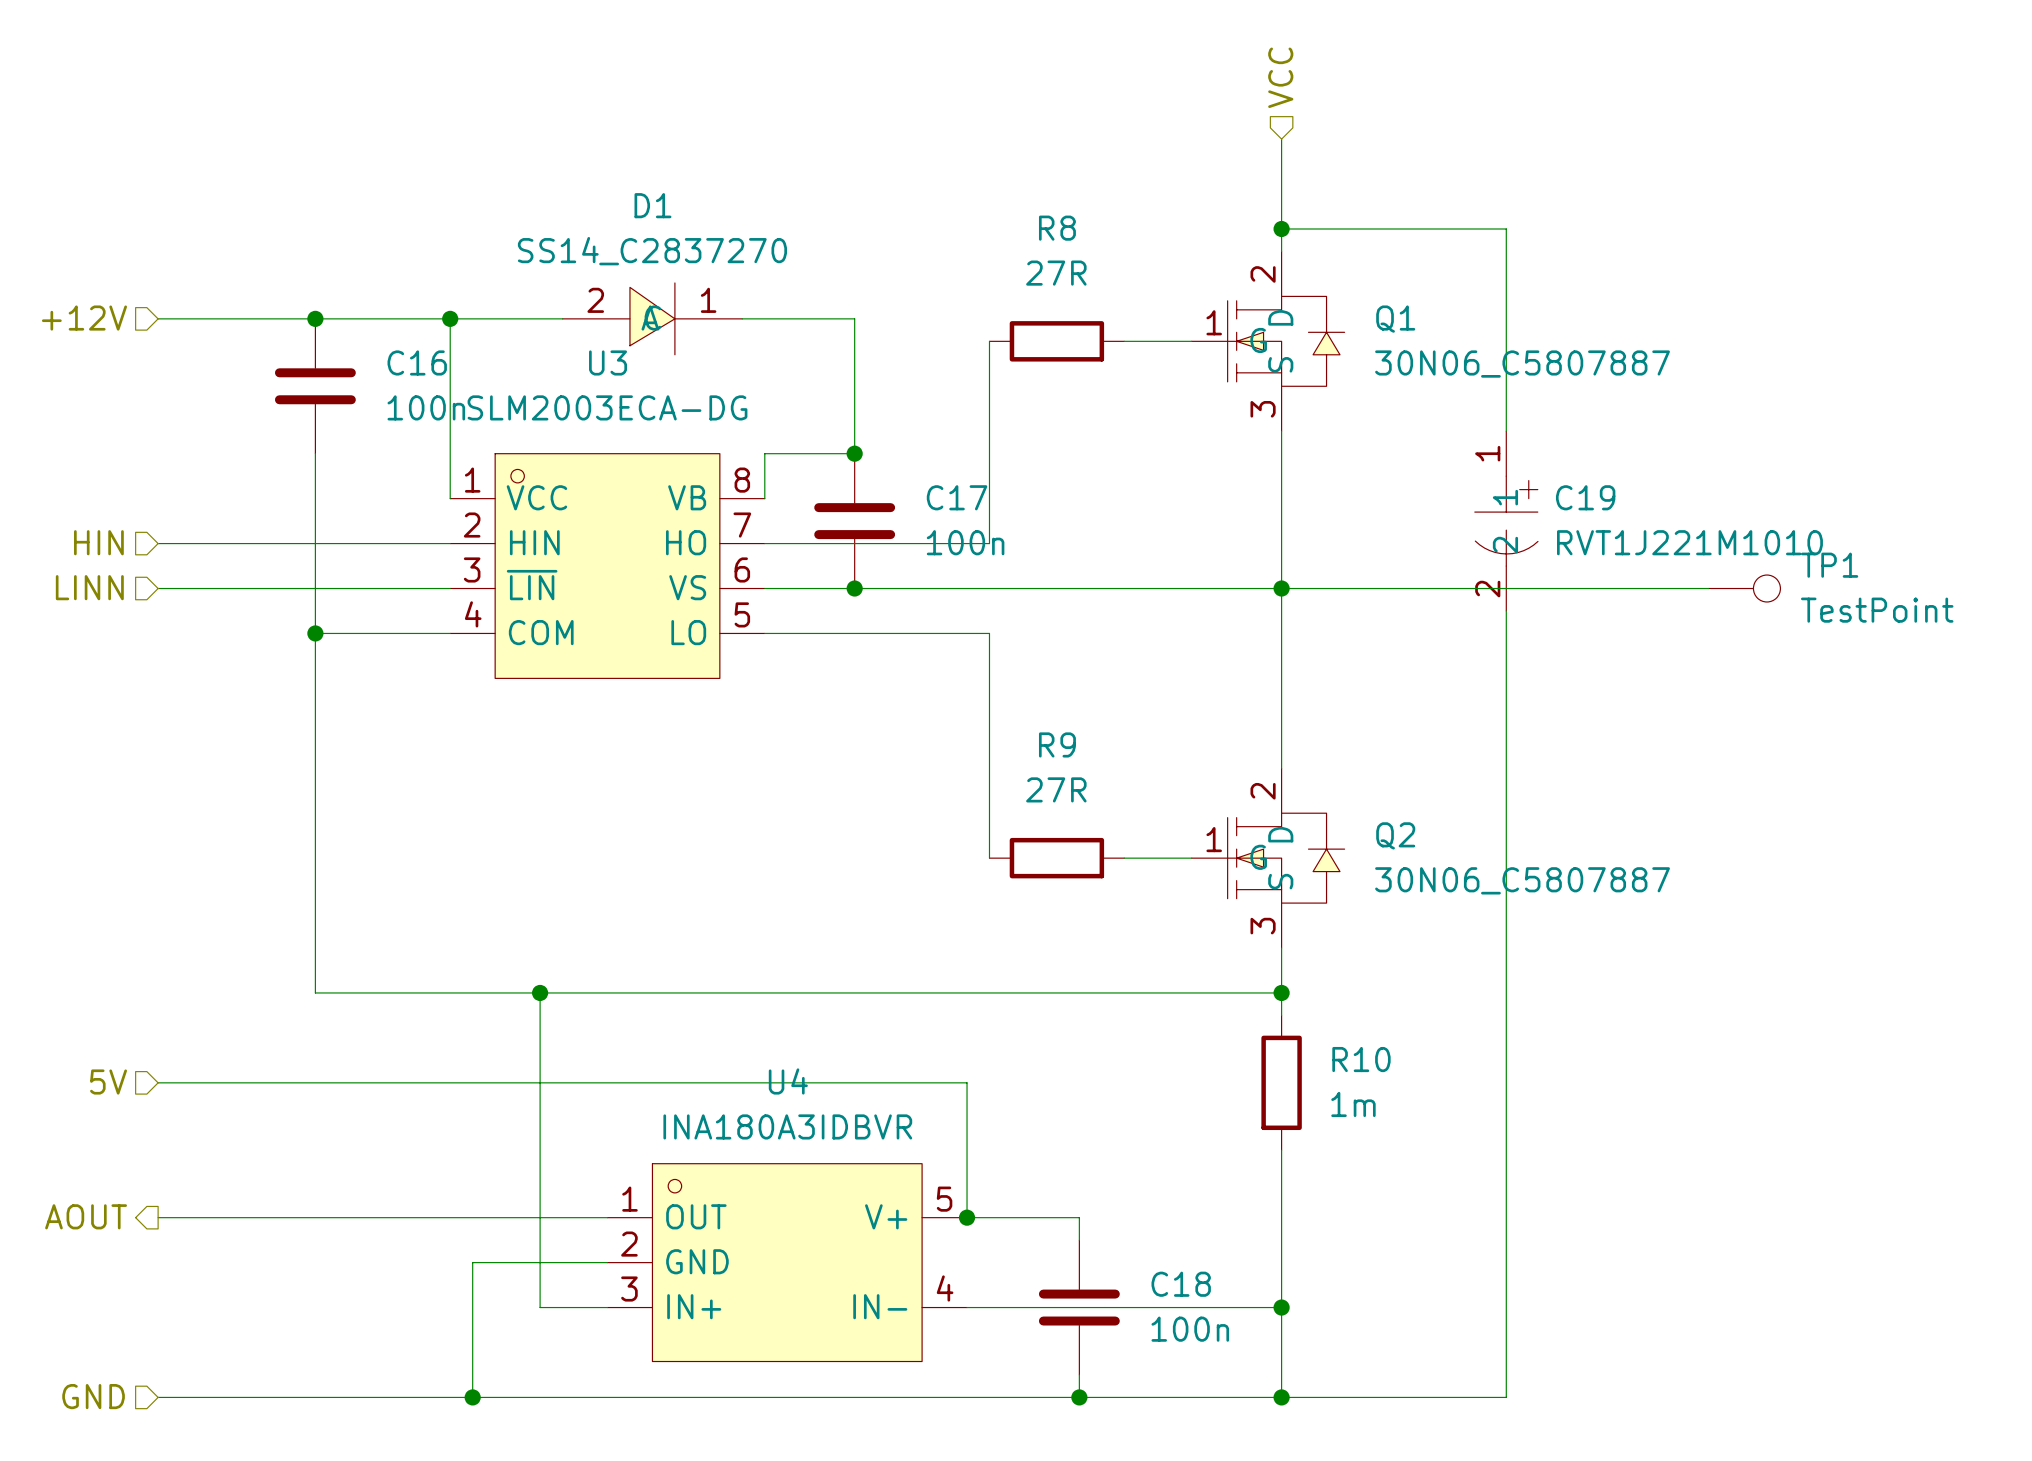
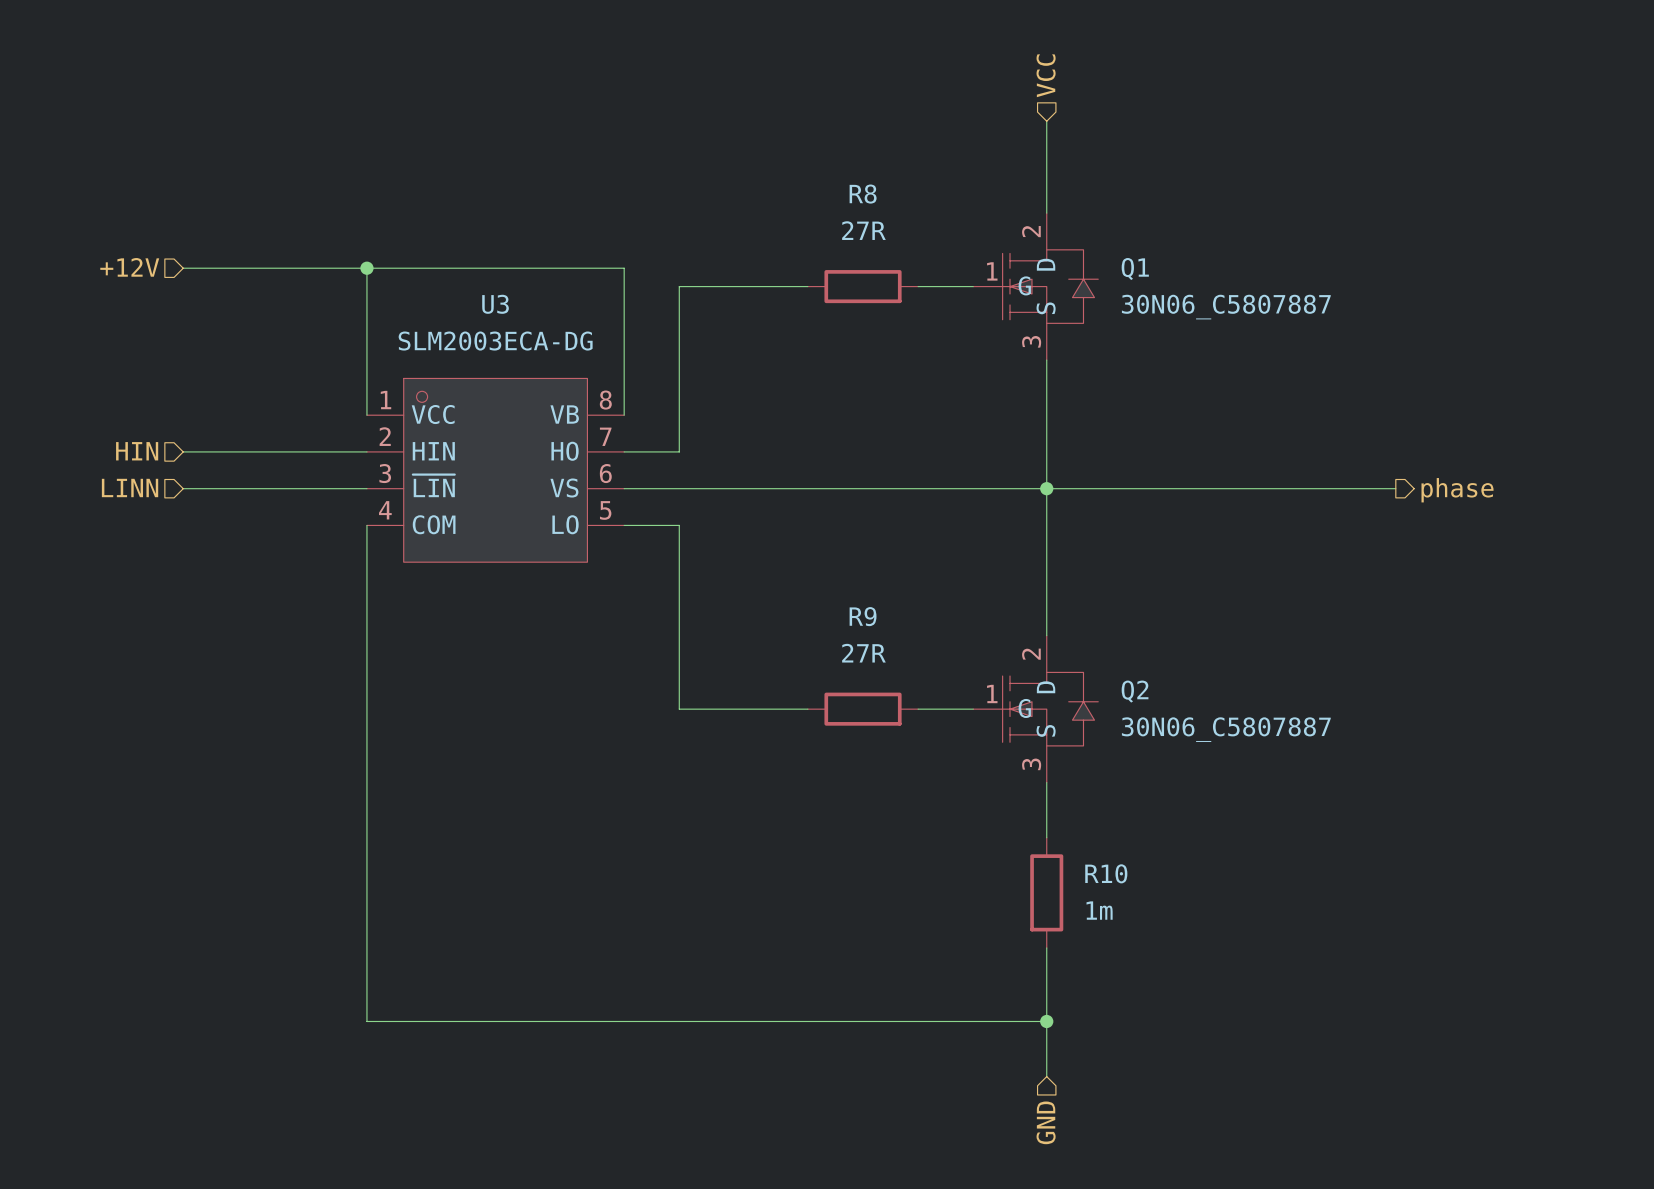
wire: (1281, 228) (1506, 228) (1506, 431) -> none
junction: (1281, 228) -> none
hierarchical label position: +12V (84, 318) -> +12V (129, 267)
wire: (158, 318) (225, 318) -> none
junction: (315, 318) -> none
D1: SS14_C2837270 (652, 318) -> none
wire: (764, 318) (854, 318) (854, 453) (764, 453) -> (624, 268) (624, 378)
wire: (989, 341) (989, 543) (832, 543) -> (807, 286) (679, 286) (679, 451)
C16: 100n (315, 386) -> none
wire: (315, 453) (315, 992) (1281, 992) -> none
junction: (854, 453) -> none
C17: 100n (854, 521) -> none
C19: RVT1J221M1010 (1506, 521) -> none
hierarchical label position: HIN (98, 542) -> HIN (137, 451)
wire: (158, 543) (225, 543) -> none
hierarchical label position: LINN (89, 587) -> LINN (130, 488)
wire: (158, 588) (225, 588) -> none
junction: (854, 588) -> none
TP1: TestPoint (1744, 588) -> none
hierarchical label: none -> phase (1457, 490)
wire: (1506, 610) (1506, 1397) (158, 1397) -> none
wire: (315, 633) (450, 633) -> (1046, 1021) (366, 1021) (366, 525)
junction: (315, 633) -> none
wire: (832, 633) (989, 633) (989, 858) -> (679, 525) (679, 709) (807, 709)
wire: (540, 992) (540, 1307) (607, 1307) -> none
junction: (540, 992) -> none
junction: (1281, 992) -> none
hierarchical label: 5V (108, 1082) -> none
wire: (158, 1082) (967, 1082) (967, 1217) (1079, 1217) (1079, 1240) -> none
hierarchical label: AOUT (86, 1216) -> none
wire: (158, 1217) (607, 1217) -> none
junction: (967, 1217) -> none
wire: (607, 1262) (472, 1262) (472, 1397) -> none
U4: INA180A3IDBVR (787, 1262) -> none
wire: (967, 1307) (1281, 1307) (1281, 1397) -> none
C18: 100n (1079, 1307) -> none
junction position: (1281, 1307) -> (1046, 1021)
hierarchical label: none -> GND (1046, 1122)
wire: (1079, 1374) (1079, 1397) -> none
hierarchical label: GND (93, 1396) -> none
junction: (472, 1397) -> none
junction: (1079, 1397) -> none
junction: (1281, 1397) -> none

